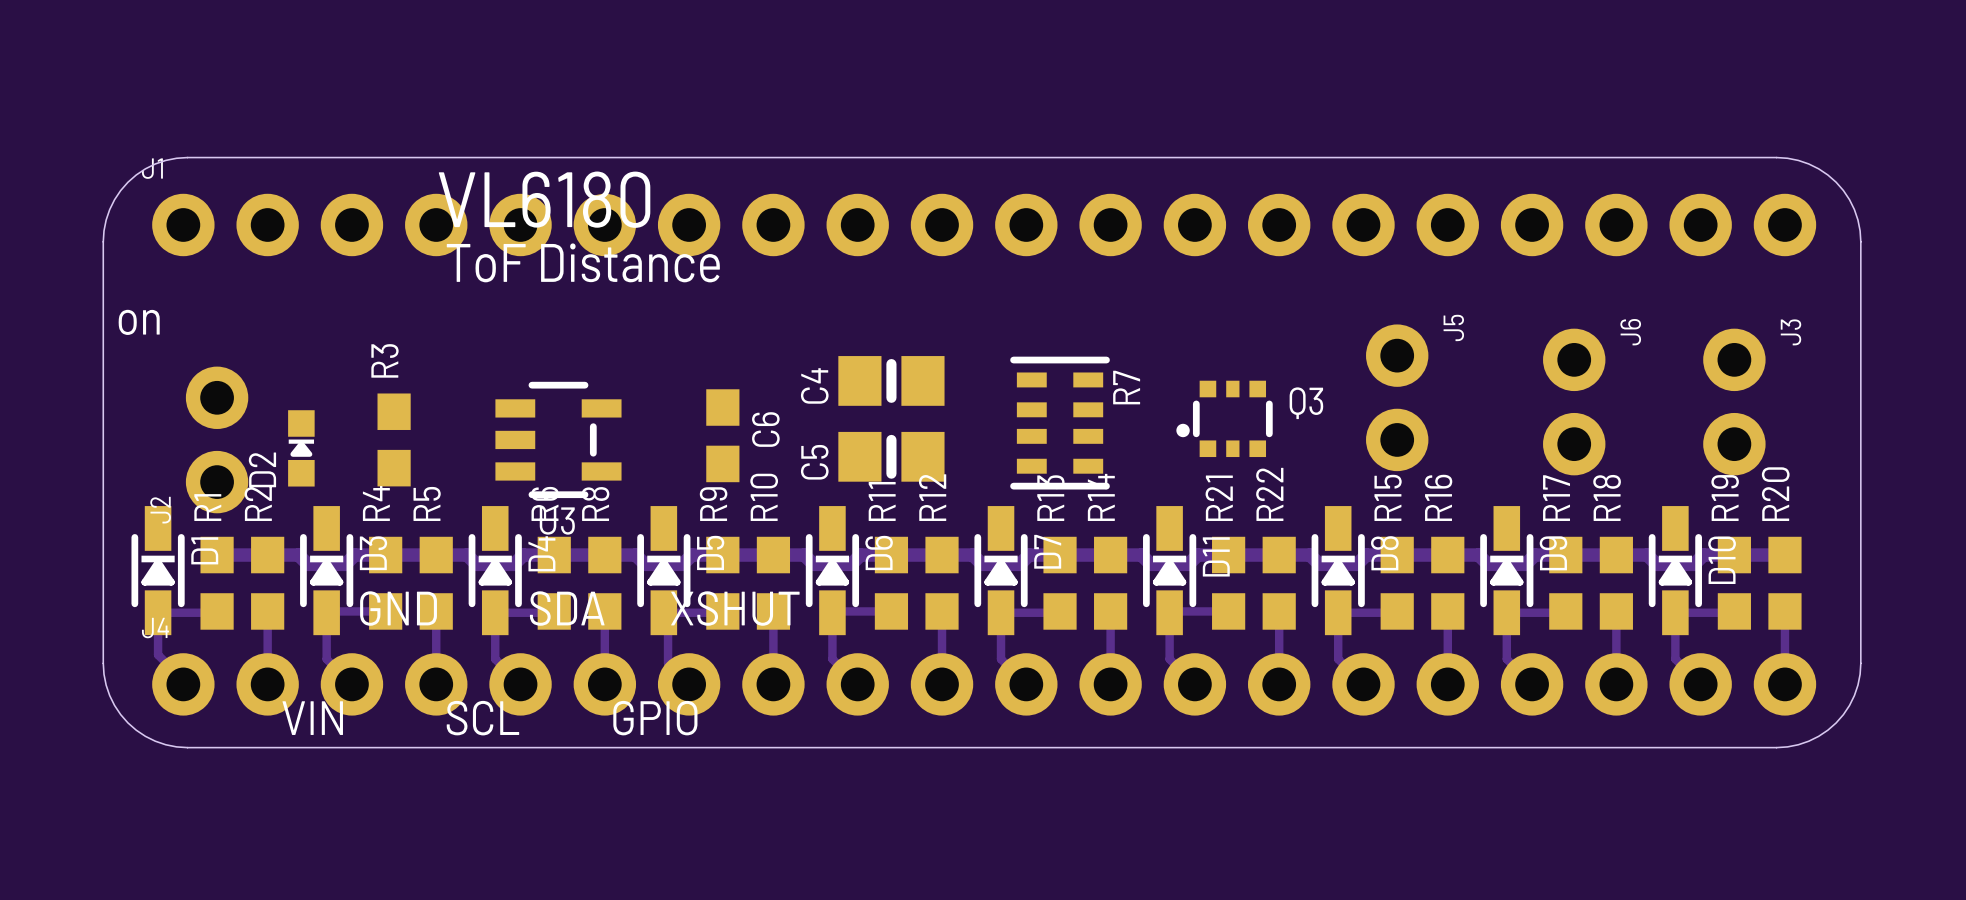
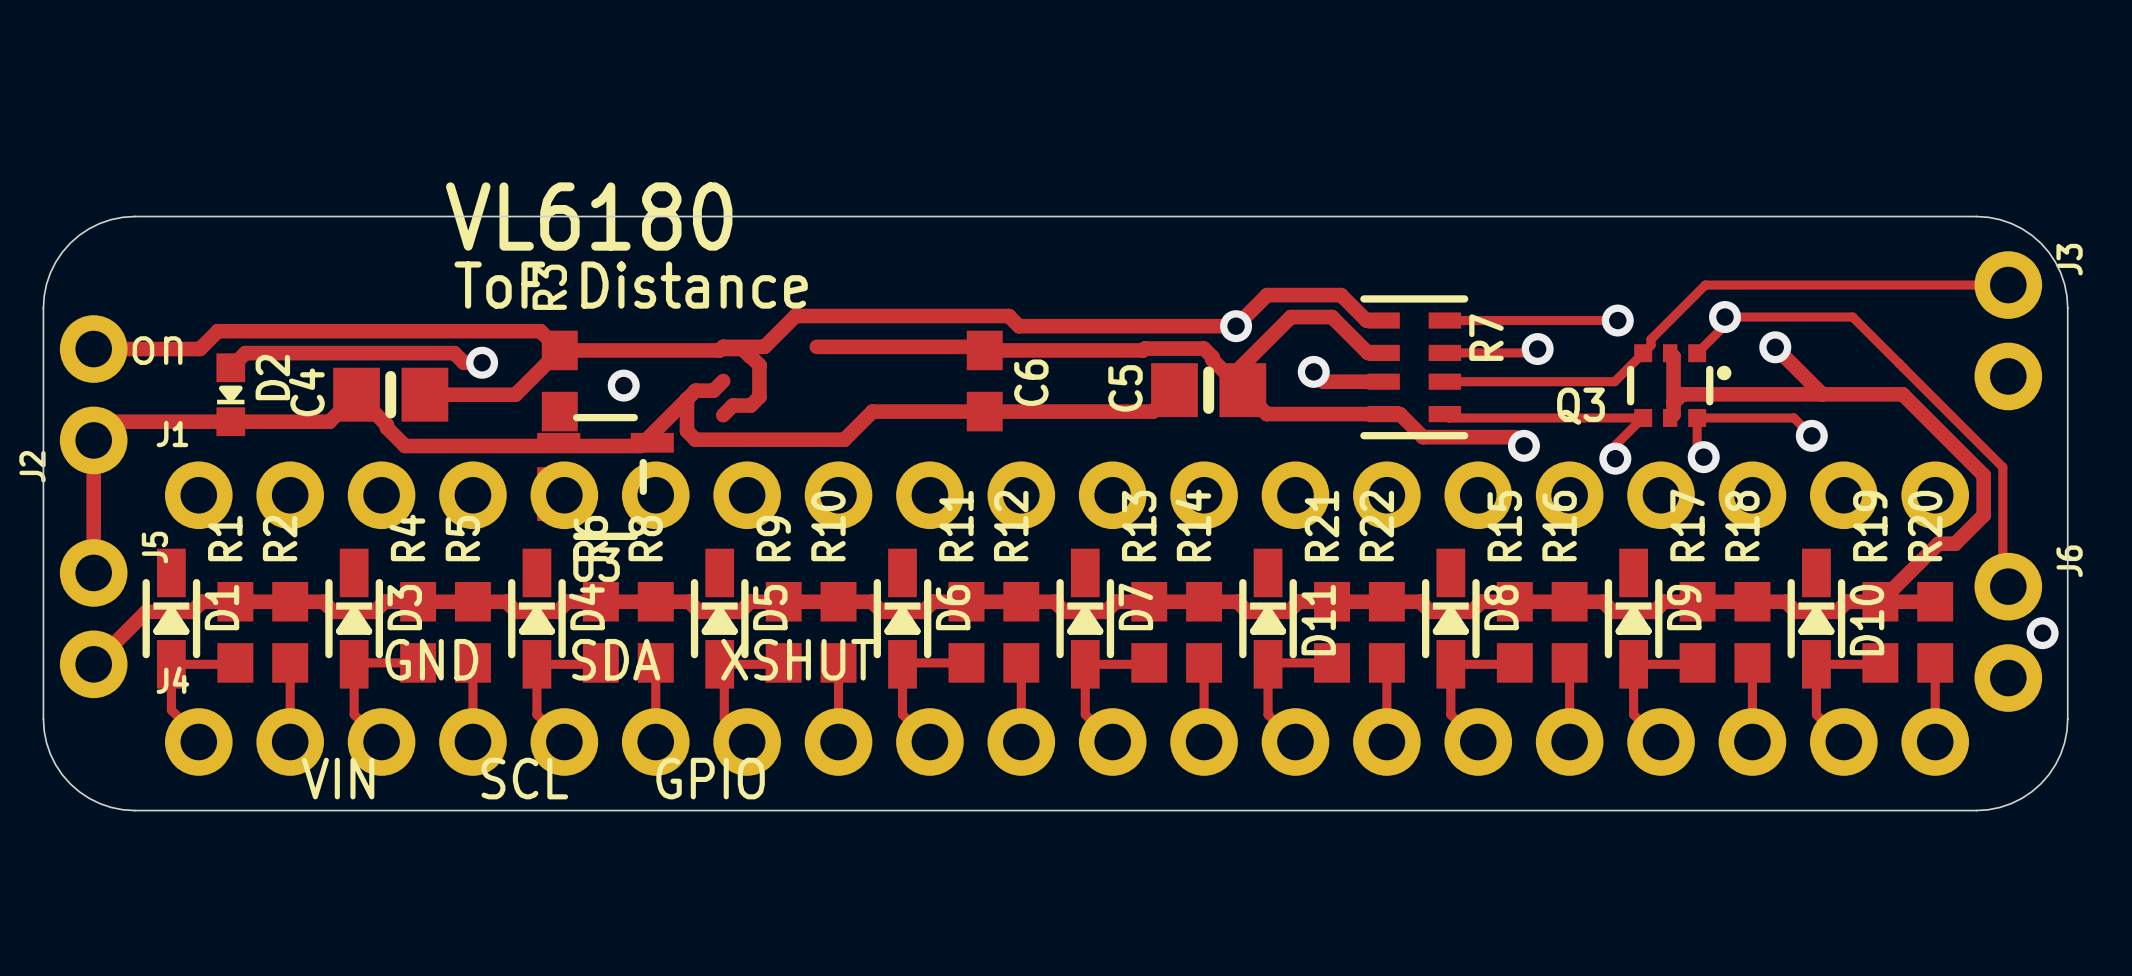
J1 position: (984, 224) -> (1067, 495)
track: none -> (2008, 285) (1705, 285) (1650, 339) (1650, 345) (1614, 381) (1444, 381)
via: none -> (1725, 317)
track: none -> (1383, 320) (1366, 320) (1341, 295) (1267, 295) (1236, 326) (1018, 326) (1008, 316) (795, 316) (764, 346) (723, 346) (719, 350) (559, 350)
track: none -> (1444, 320) (1617, 320)
via: none -> (1617, 320)
via: none -> (1236, 326)
track: none -> (816, 346) (981, 346) (984, 350) (1203, 348) (1212, 357) (1212, 359) (1266, 414) (1399, 414) (1422, 437) (1515, 437) (1523, 445)
track: none -> (1775, 347) (1822, 394)
via: none -> (1775, 347)
track: none -> (93, 349) (200, 349) (217, 331) (540, 331) (559, 350)
track: none -> (721, 349) (742, 349) (759, 365) (759, 396) (750, 405) (732, 405) (723, 415)
track: none -> (1537, 349) (1533, 352) (1444, 352)
via: none -> (1537, 349)
track: none -> (559, 350) (515, 394) (424, 394)
track: none -> (1383, 352) (1367, 352) (1332, 317) (1290, 317) (1230, 377)
track: none -> (1670, 353) (1673, 356) (1673, 414) (1670, 417)
track: none -> (1697, 353) (1725, 325) (1725, 317) (1852, 317) (2002, 467) (2002, 581) (2008, 586)
track: none -> (482, 362) (463, 362) (454, 353) (245, 353) (230, 367)
via: none -> (482, 362)
track: none -> (1313, 371) (1323, 381) (1383, 381)
via: none -> (1313, 371)
track: none -> (723, 381) (713, 390) (695, 390) (640, 446) (405, 446) (356, 394) (329, 421) (112, 421) (93, 440) (93, 572)
via: none -> (623, 385)
track: none -> (1174, 390) (1153, 411) (872, 411) (844, 439) (695, 439) (686, 431) (686, 399)
track: none -> (1673, 402) (1682, 394) (1902, 394) (1983, 475) (1983, 515) (1955, 543) (1938, 543) (1880, 601)
C4 position: (891, 380) -> (390, 394)
track: none -> (1444, 414) (1448, 417) (1643, 417)
track: none -> (1642, 417) (1615, 445) (1615, 458)
J5 position: (1397, 397) -> (93, 618)
J6 position: (1574, 402) -> (2008, 632)
track: none -> (1811, 435) (1793, 417) (1697, 417) (1697, 450) (1703, 457)
via: none -> (1811, 435)
J3 position: (1734, 402) -> (2008, 330)
via: none -> (1523, 445)
Q3 rotation: 0° (1224, 418) -> 180° (1679, 385)
Q3 position: (1224, 418) -> (1679, 385)
via: none -> (1703, 457)
R7 position: (1060, 423) -> (1414, 367)
via: none -> (1615, 458)
C6 position: (722, 435) -> (984, 381)
J2 position: (217, 439) -> (93, 394)
R3 position: (394, 439) -> (559, 381)
D2 rotation: 0° (301, 448) -> 180° (230, 394)
D2 position: (301, 448) -> (230, 394)
C5 position: (891, 456) -> (1208, 390)
track: none -> (235, 601) (201, 601) (191, 611) (146, 611) (93, 664)
via: none -> (2042, 633)
board edge: (187, 747) (155, 741) (127, 722) (109, 695) (103, 663) (104, 230) (109, 209) (127, 182) (155, 163) (187, 157) (1776, 157) (1808, 163) (1827, 174) (1843, 190) (1854, 209) (1860, 230) (1860, 663) (1854, 695) (1836, 722) (1808, 741) (1776, 747) -> (203, 810) (122, 809) (111, 807) (89, 798) (70, 783) (62, 774) (50, 754) (44, 731) (44, 295) (50, 272) (62, 252) (70, 243) (79, 235) (99, 223) (122, 217) (1976, 216) (1999, 219) (2022, 228) (2040, 243) (2048, 252) (2060, 272) (2066, 295) (2066, 731) (2060, 754) (2048, 774) (2040, 783) (2022, 798) (1999, 807) (1988, 809) (1926, 810)

